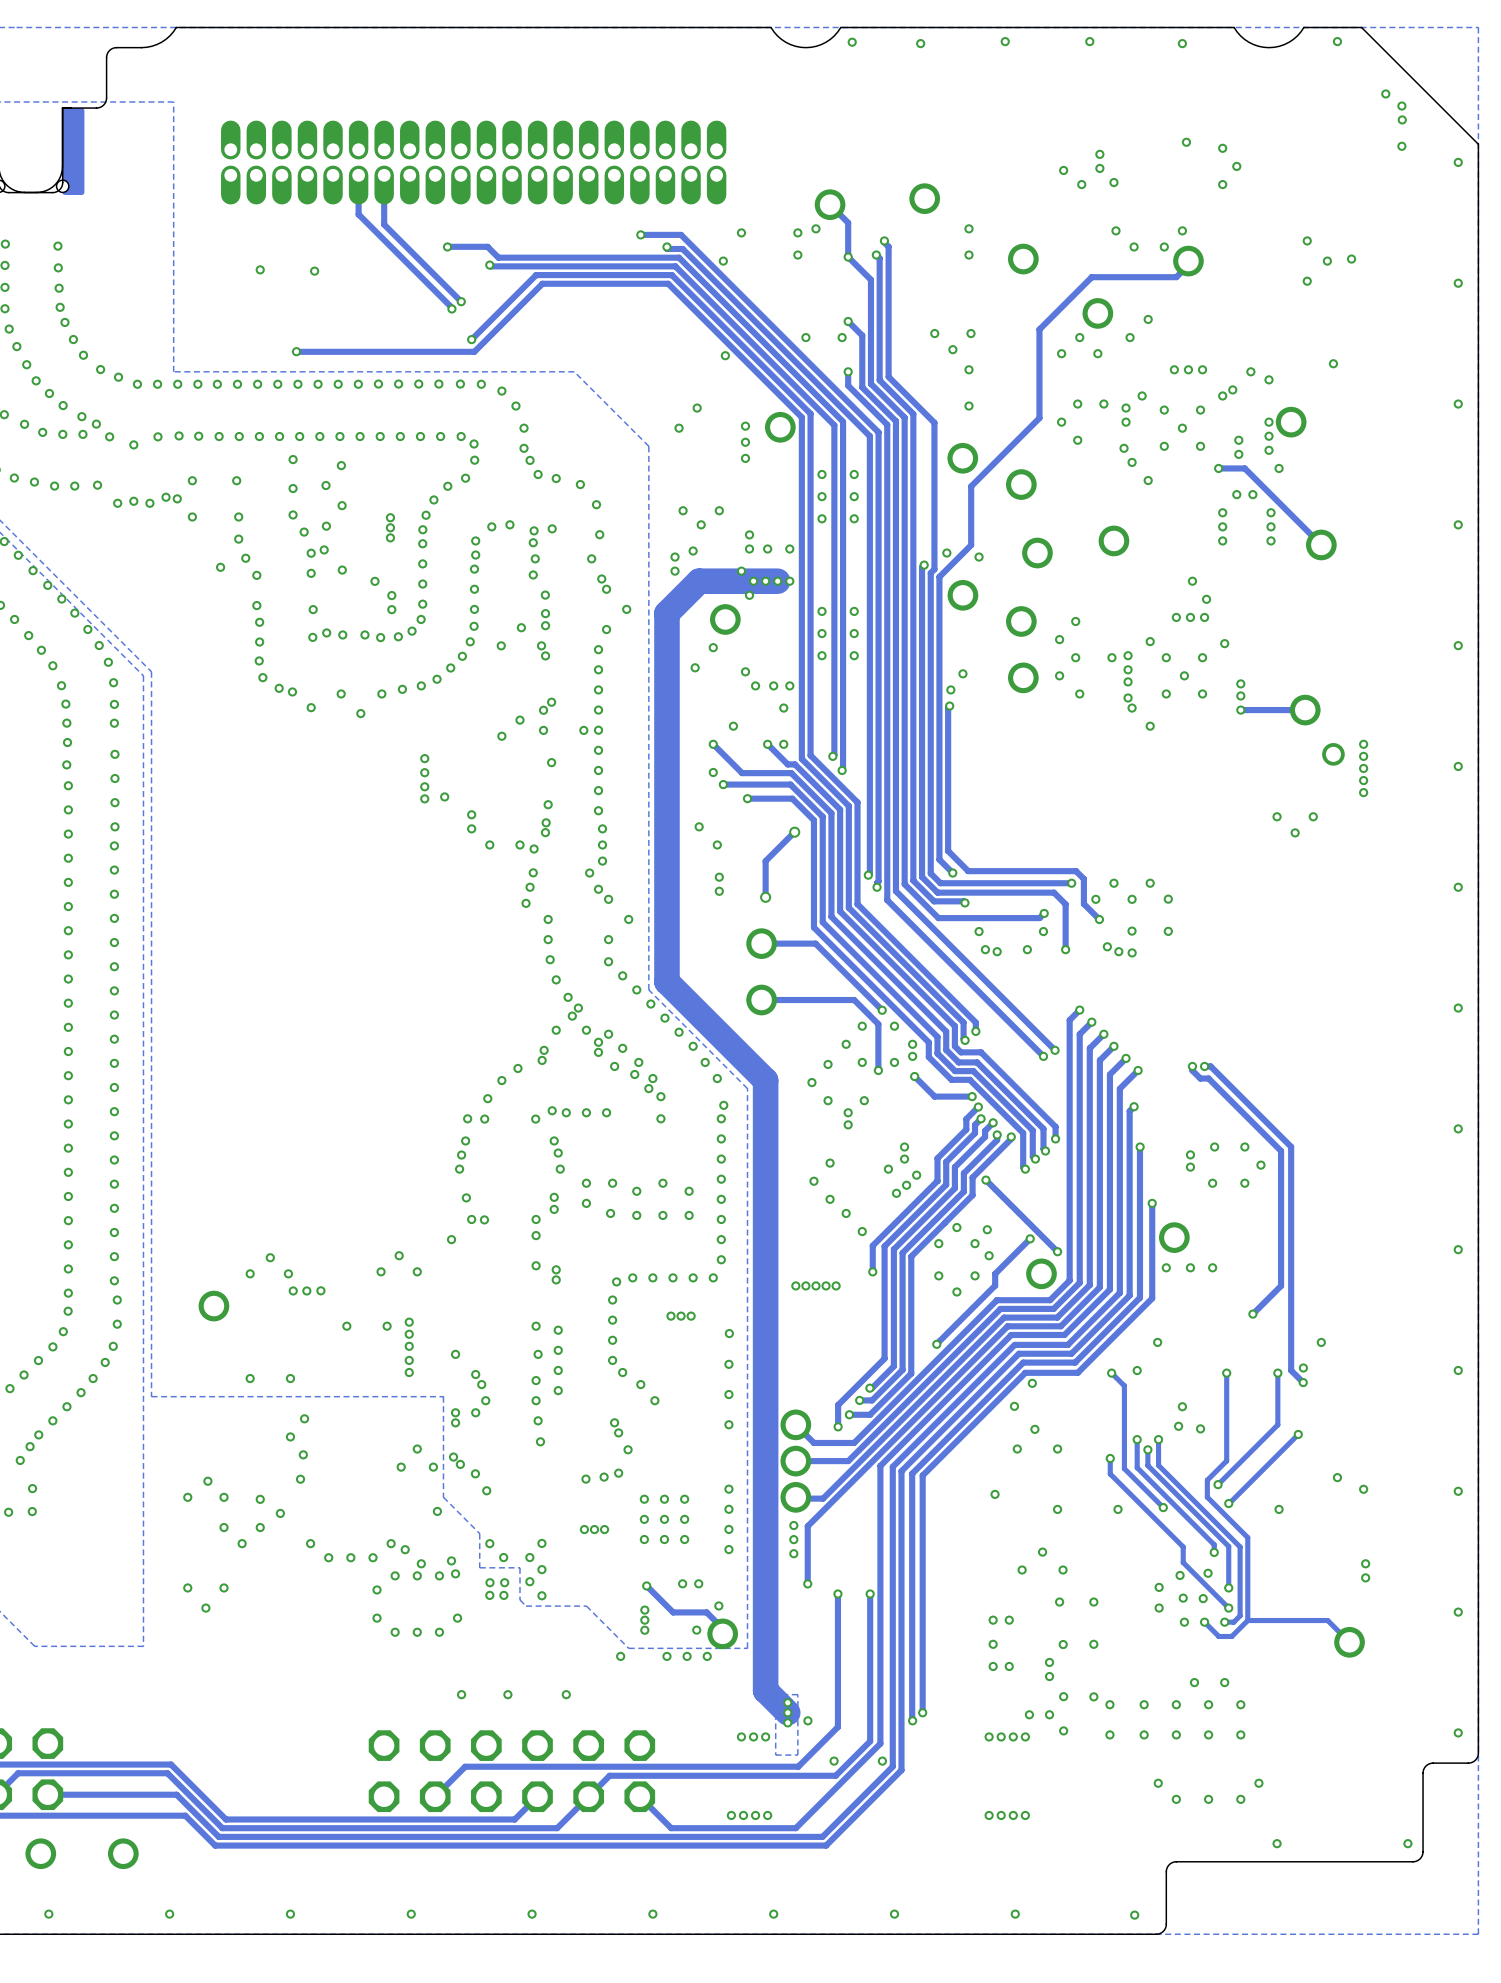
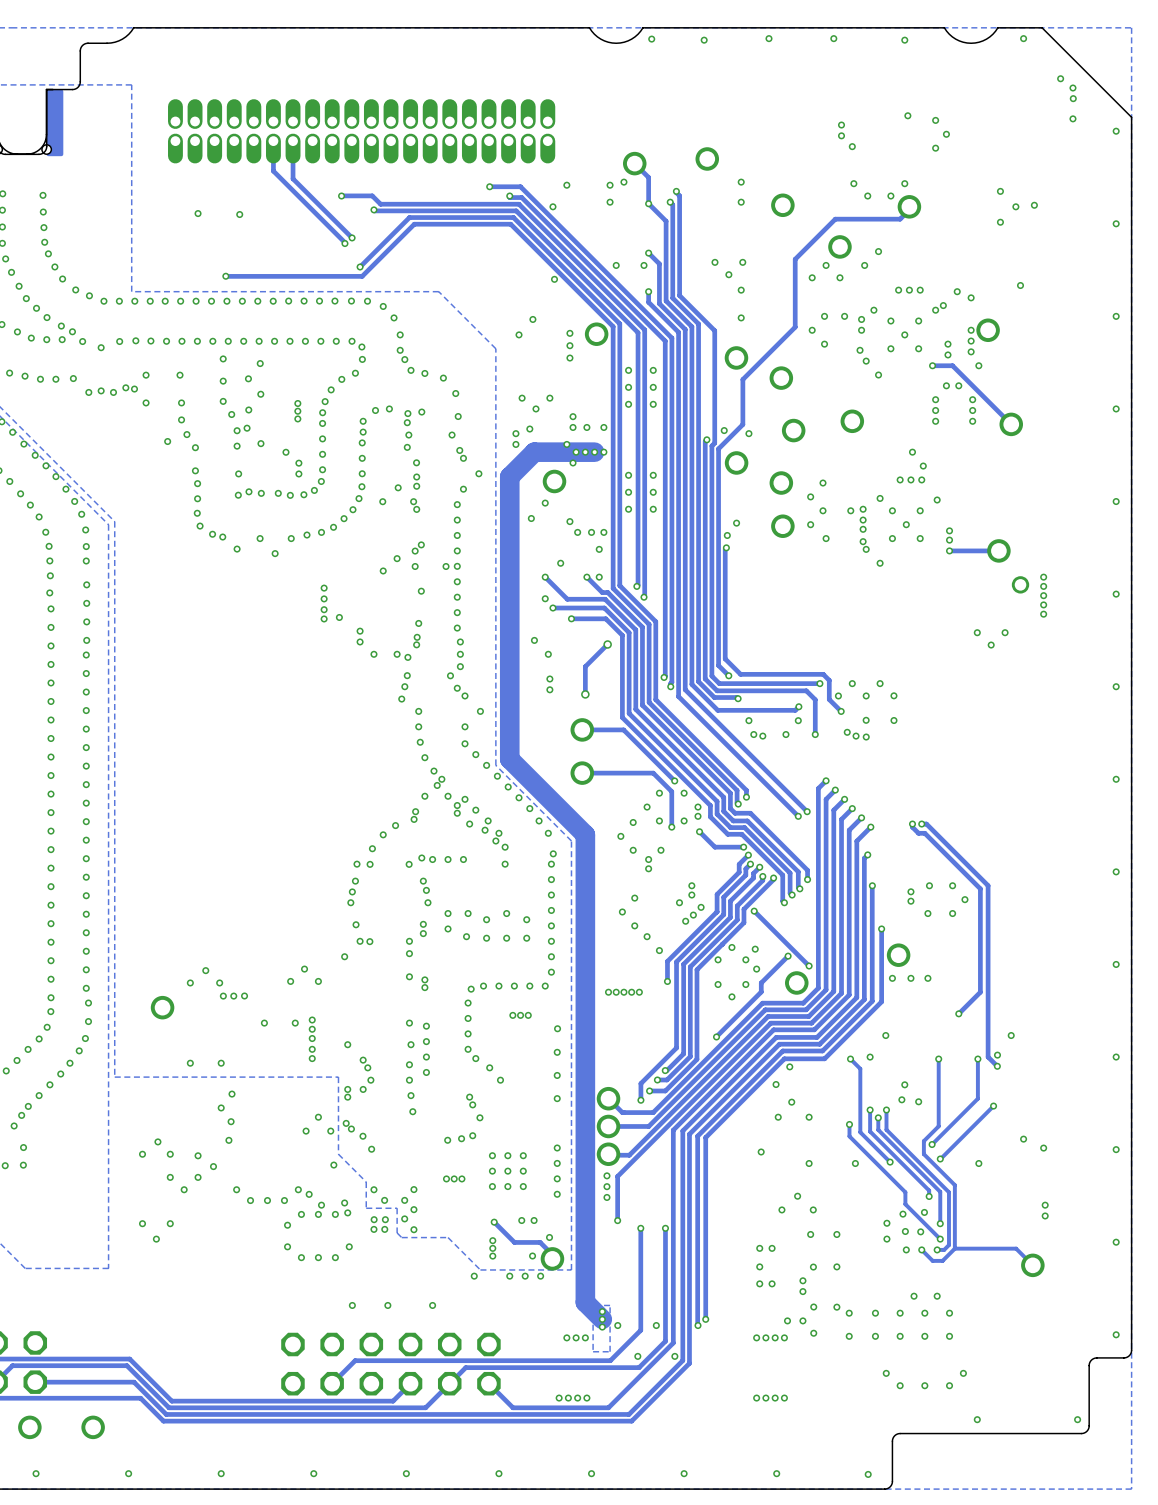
via: (1063, 170) -> none
via: (1081, 184) -> none
via: none -> (656, 1325)

